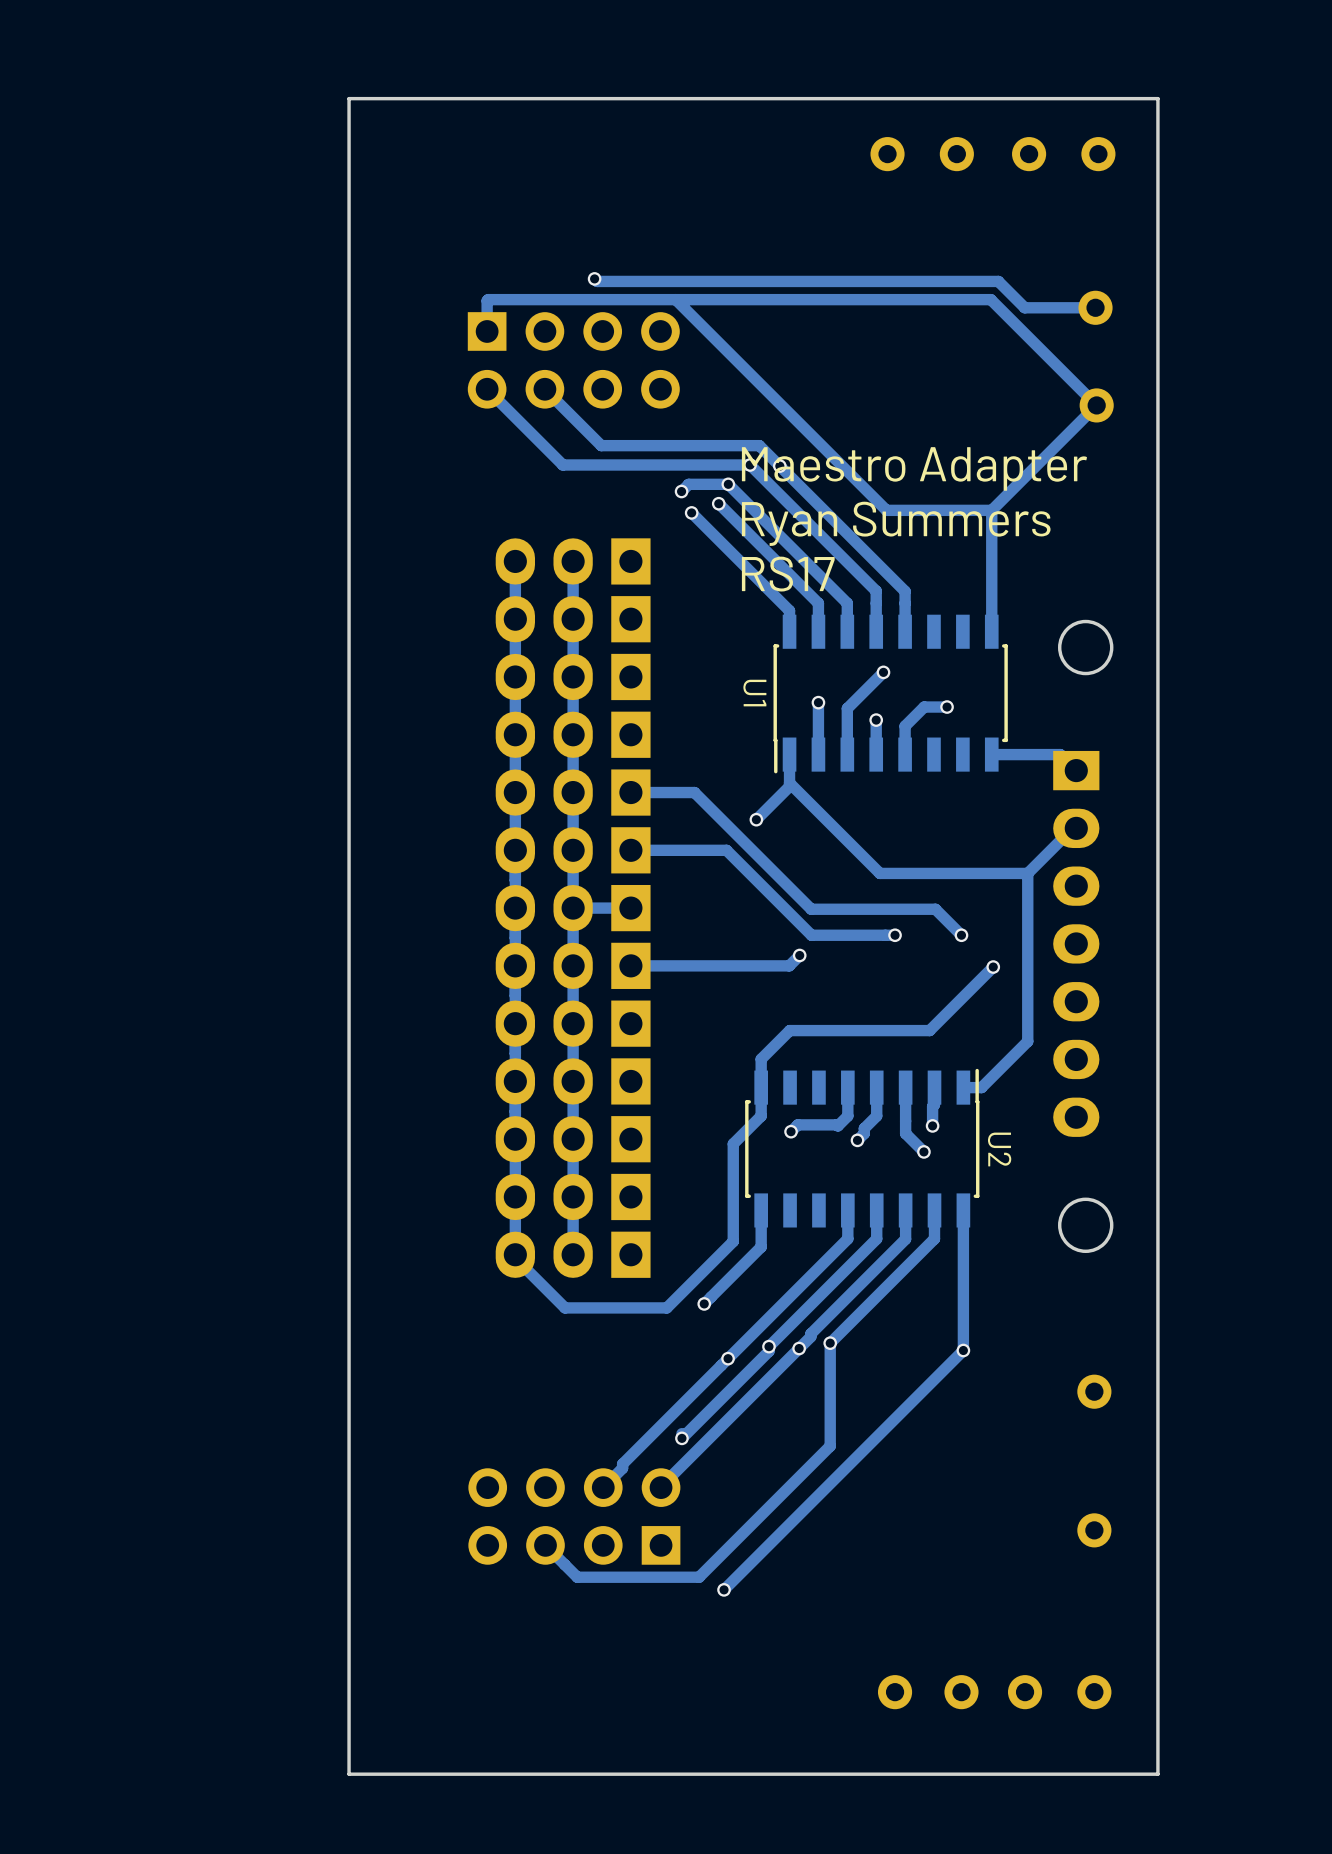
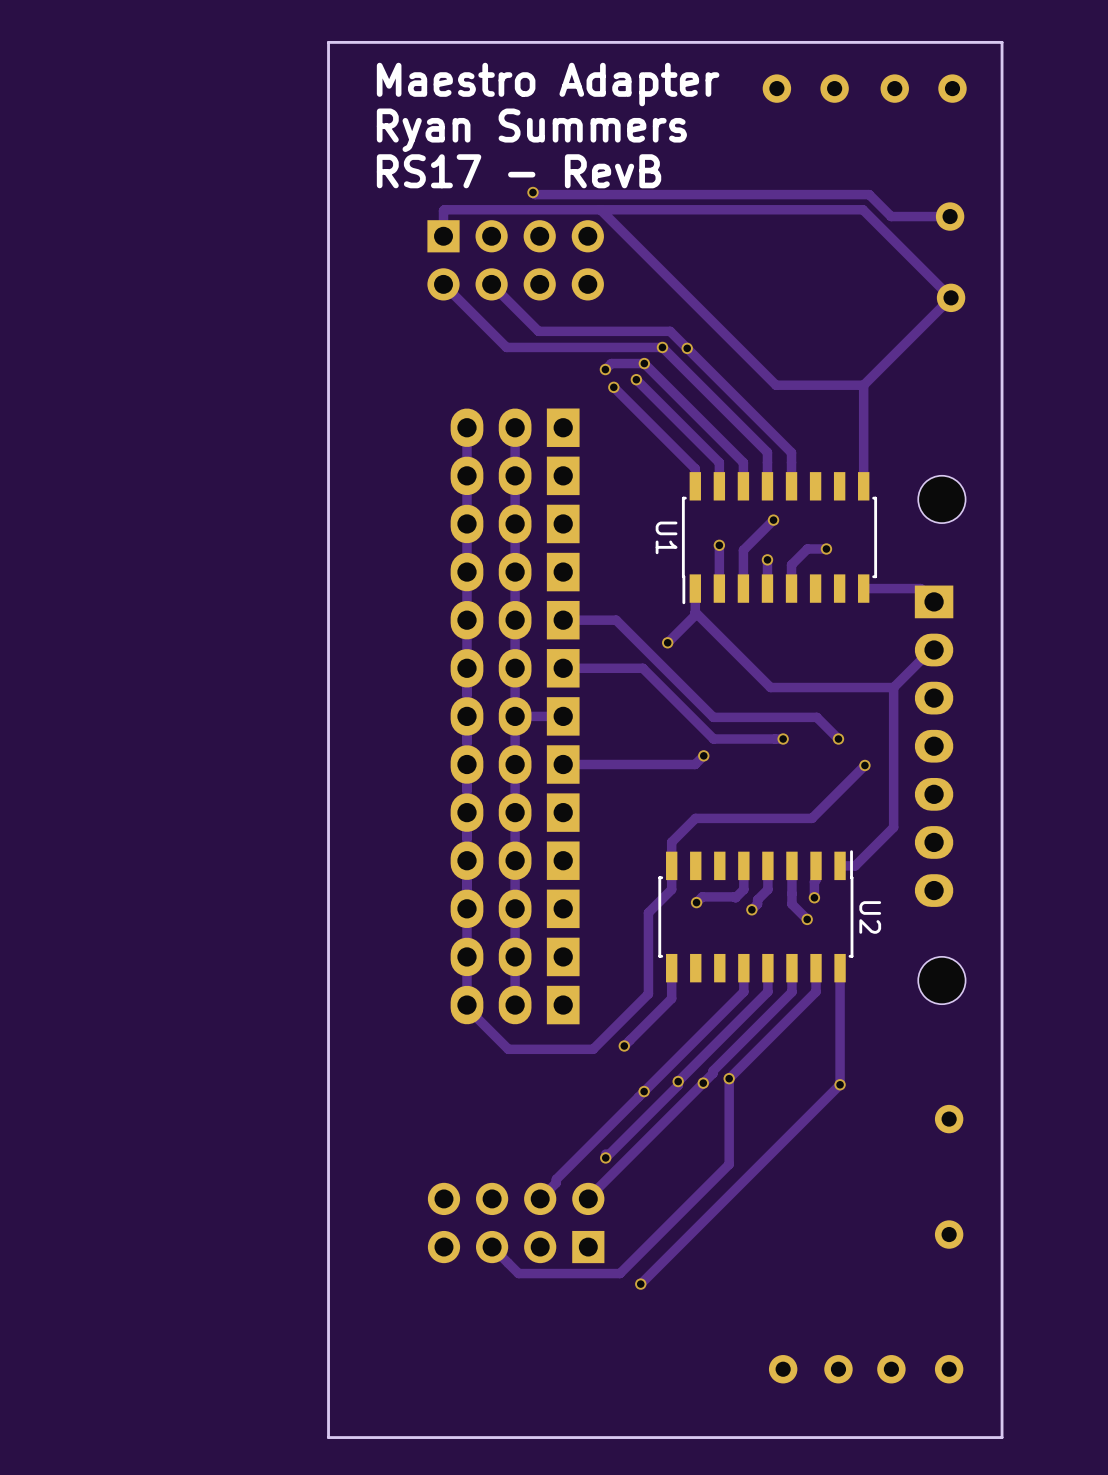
text: none -> RS17 - RevB (519, 171)
text position: Maestro Adapter (914, 468) -> Maestro Adapter (548, 84)
text position: Ryan Summers (896, 523) -> Ryan Summers (531, 130)
text: RS17 (788, 574) -> none
round board edge: [1058, 619, 1114, 676] -> none
part: none -> (941, 499)
round board edge: [1058, 1197, 1114, 1254] -> none
part: none -> (941, 980)

